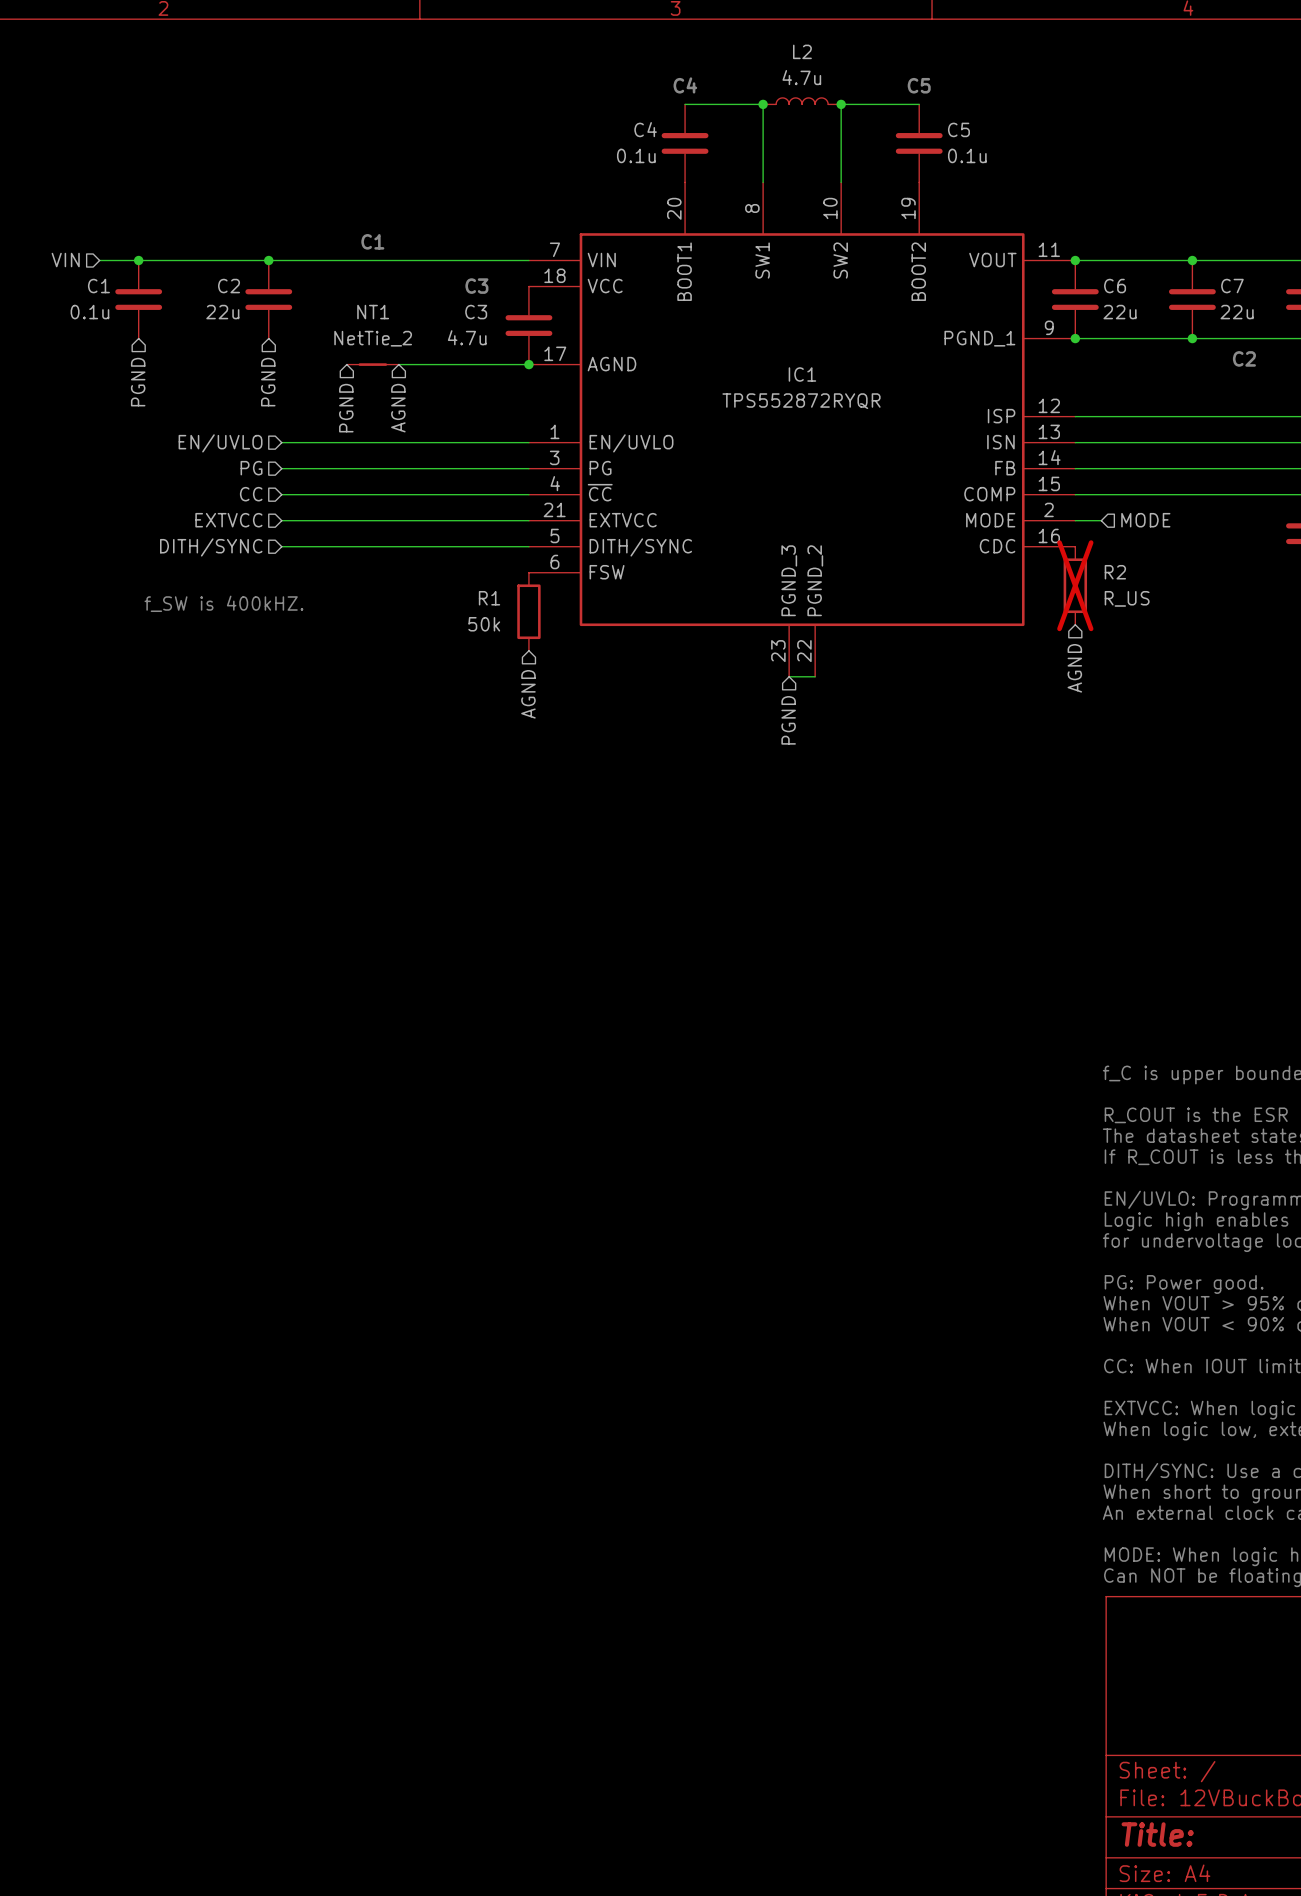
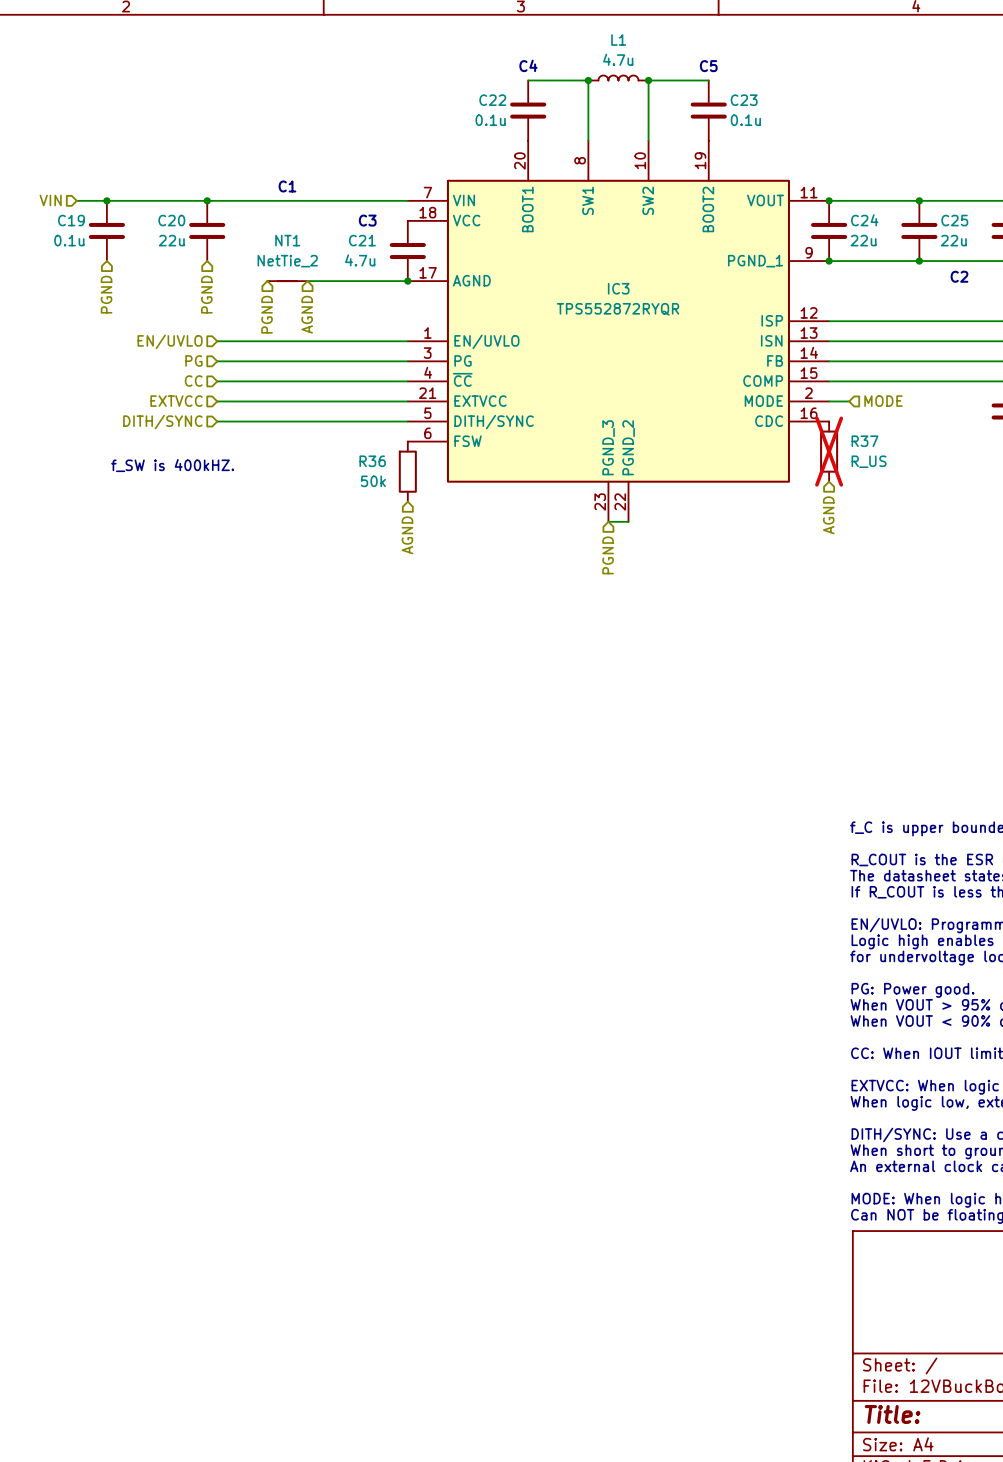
L2 name: L2 (802, 51) -> L1 (618, 40)
C4 name: C4 (645, 129) -> C22 (492, 100)
C5 name: C5 (958, 129) -> C23 (744, 100)
C1 name: C1 (98, 286) -> C19 (71, 220)
C2 name: C2 (229, 286) -> C20 (171, 220)
C6 name: C6 (1115, 286) -> C24 (864, 220)
C7 name: C7 (1232, 286) -> C25 (954, 220)
C3 name: C3 (476, 312) -> C21 (362, 240)
IC1 name: IC1 (802, 374) -> IC3 (618, 288)
R2 name: R2 (1115, 572) -> R37 (865, 441)
R1 name: R1 (489, 598) -> R36 (372, 461)

